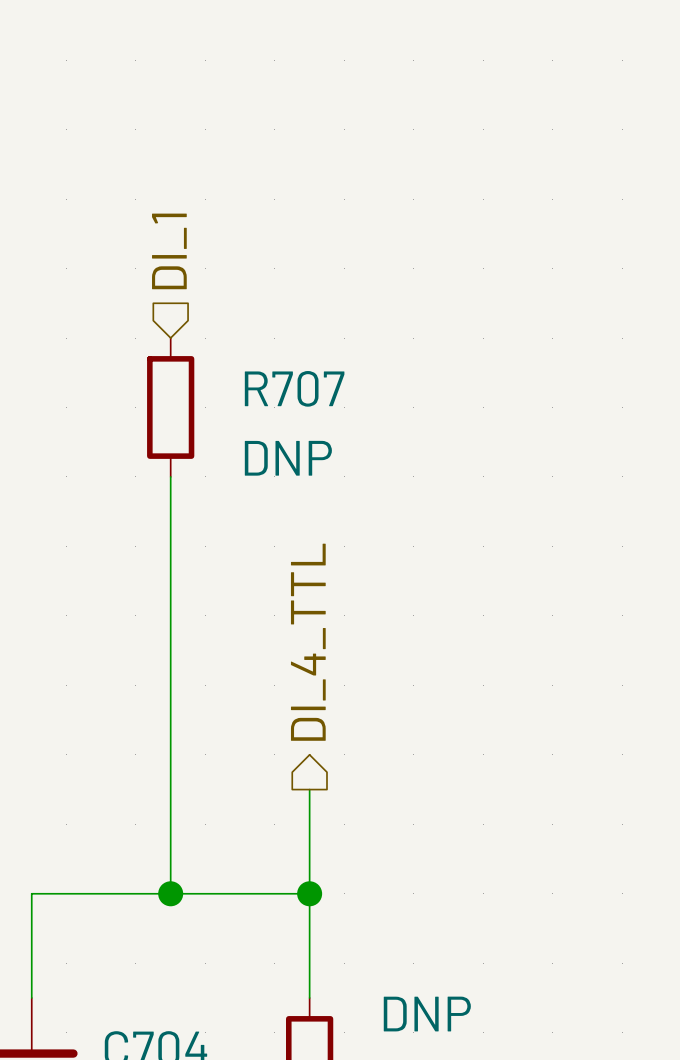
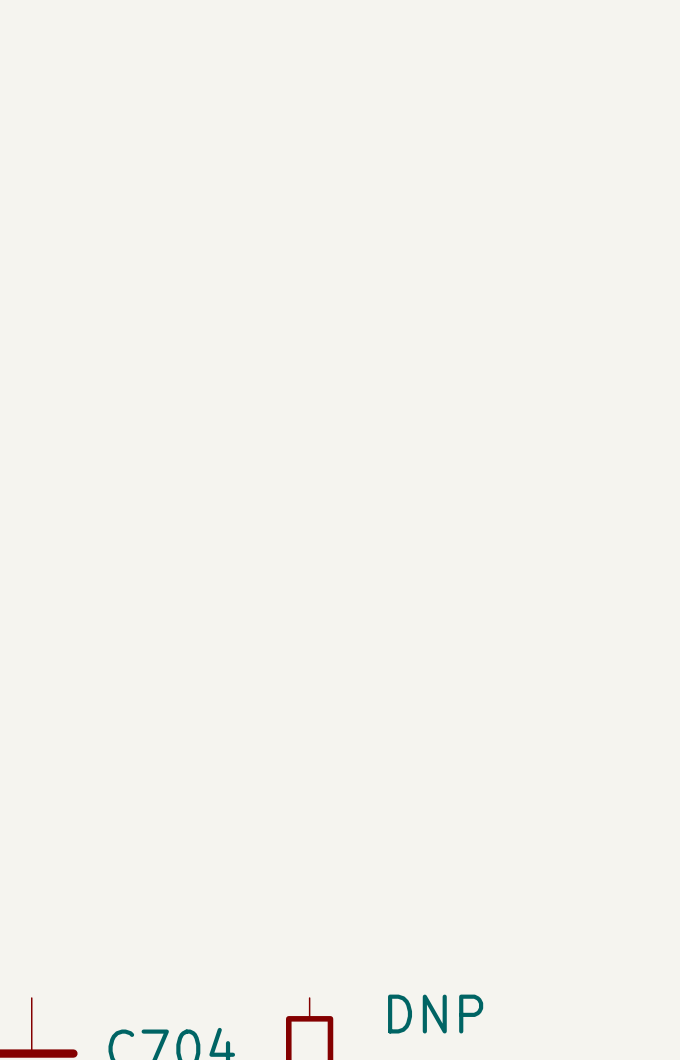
hierarchical label: DI_1 (169, 251) -> none
R707: DNP (170, 407) -> none
wire: (170, 476) (170, 893) -> none
hierarchical label: DI_4_TTL (308, 642) -> none
wire: (309, 789) (309, 997) -> none
junction: (170, 893) -> none
wire: (309, 893) (31, 893) (31, 997) -> none
junction: (309, 893) -> none

